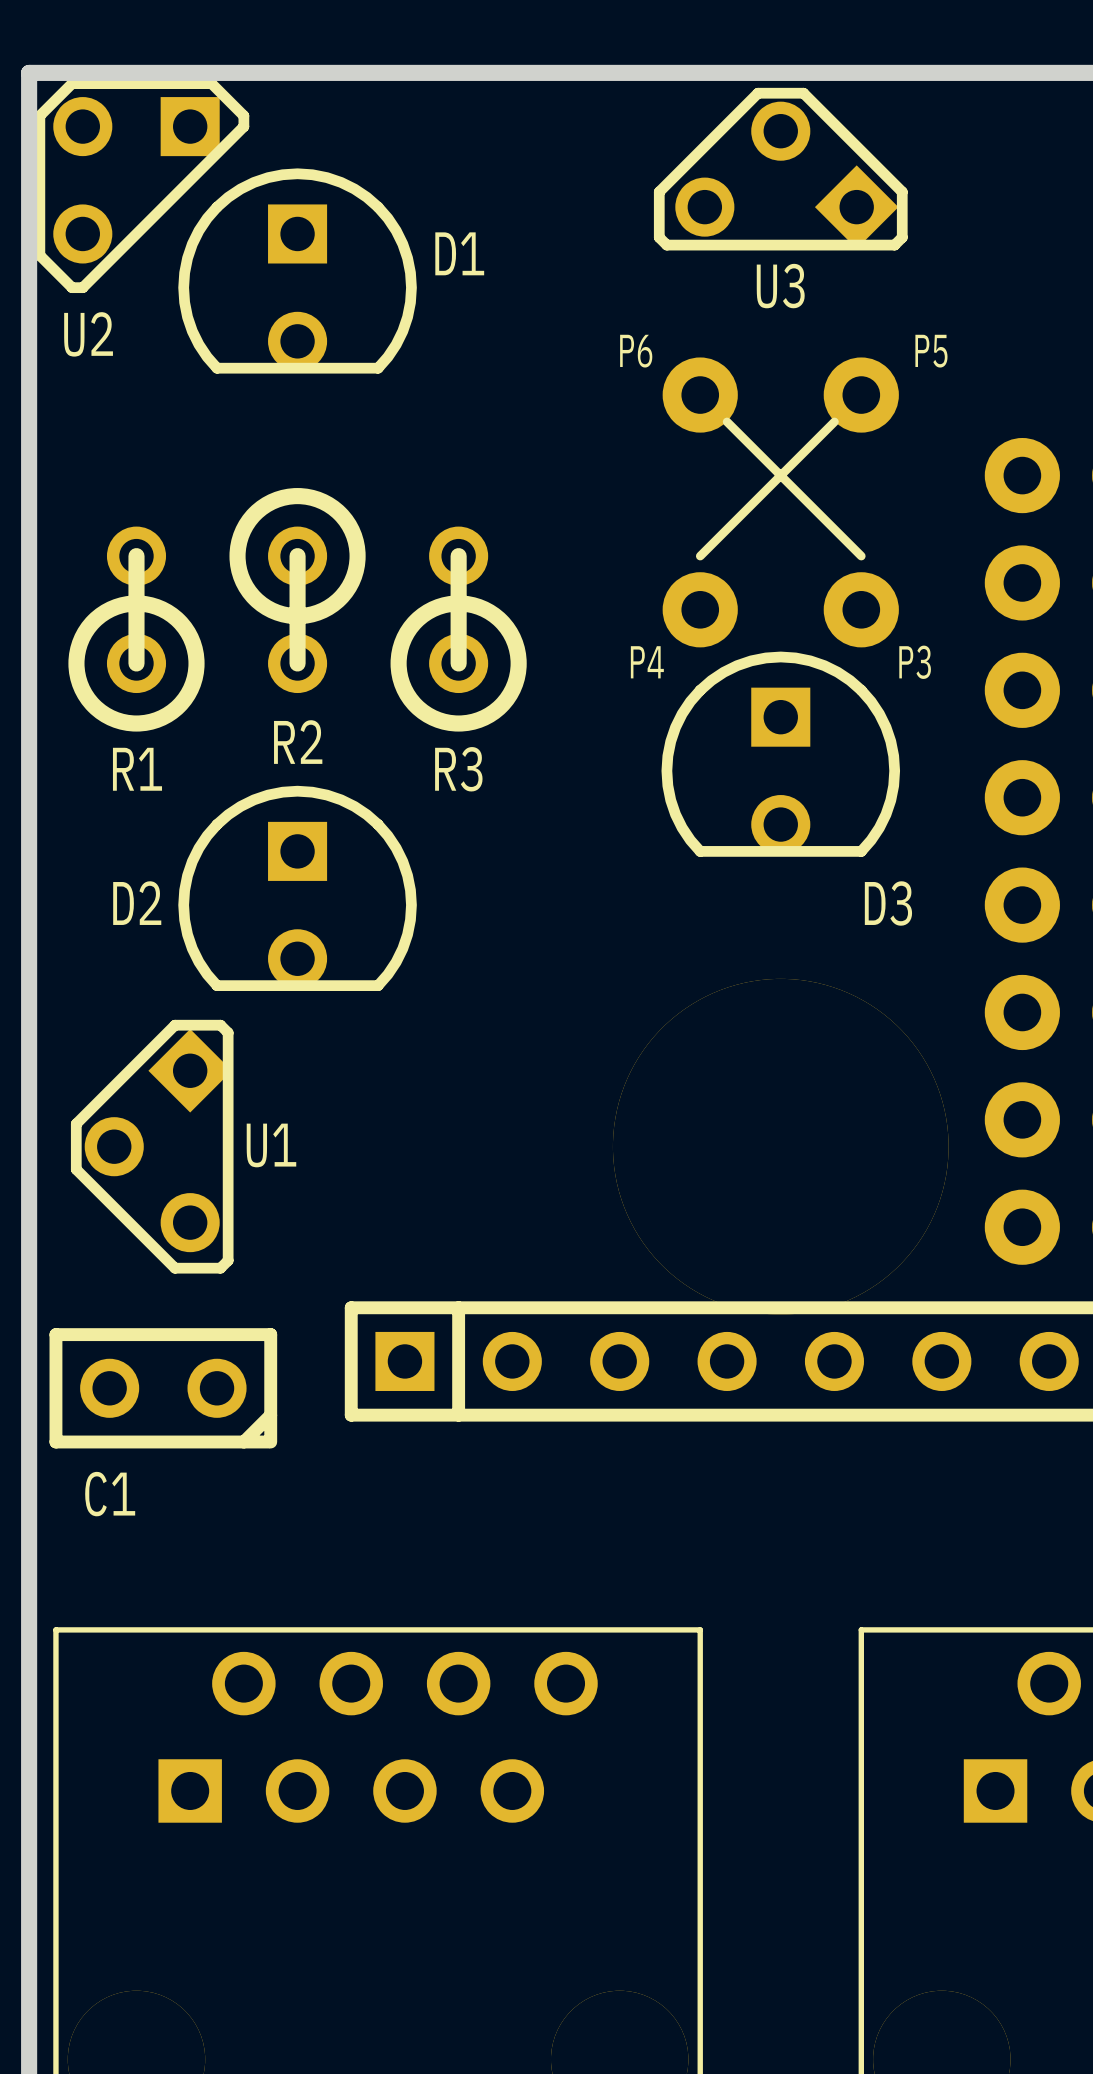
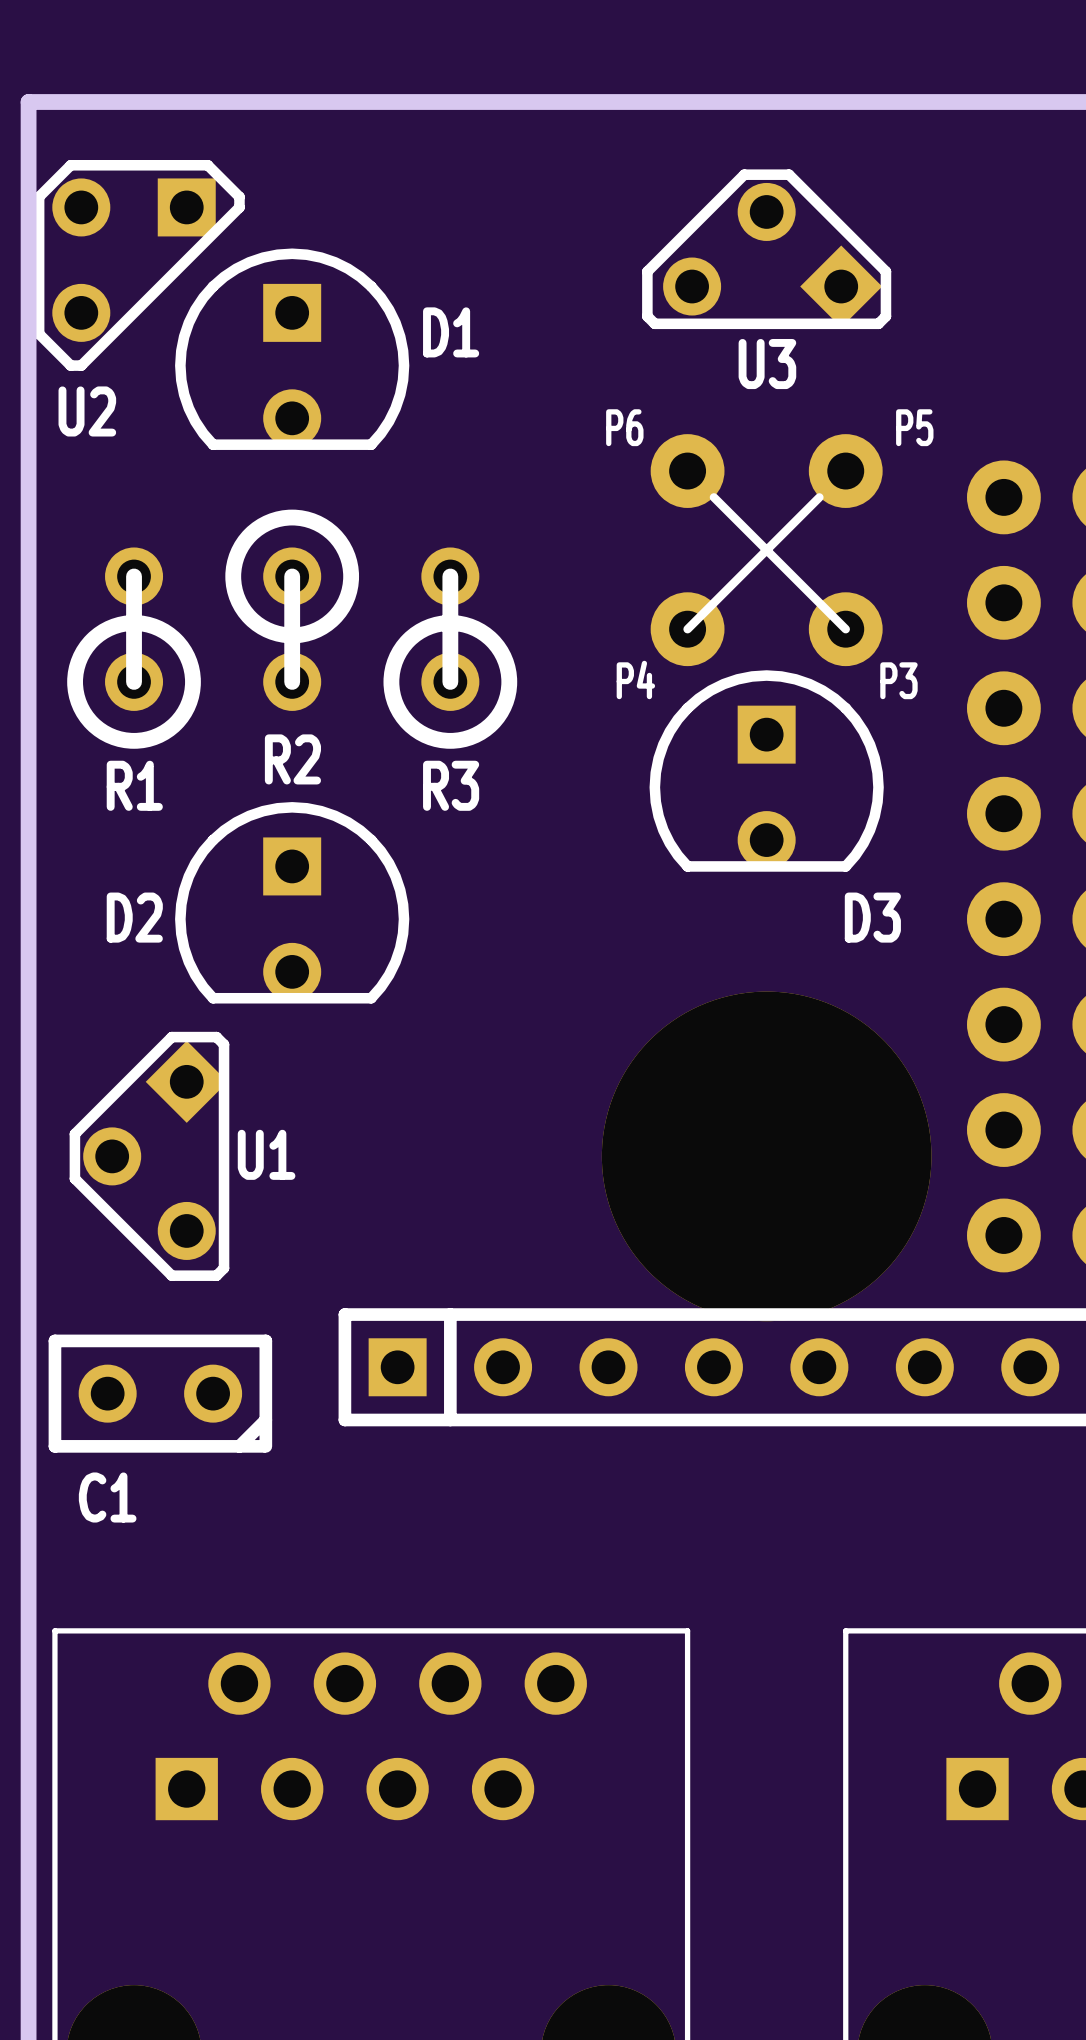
part position: (780, 169) -> (766, 249)
U2 position: (141, 185) -> (139, 265)
D1 position: (297, 270) -> (292, 349)
text position: U3 (780, 286) -> U3 (767, 364)
P6 position: (700, 395) -> (687, 471)
P5 position: (861, 395) -> (845, 471)
line: (727, 421) (861, 556) -> (713, 497) (845, 629)
line: (834, 421) (700, 556) -> (819, 497) (687, 629)

